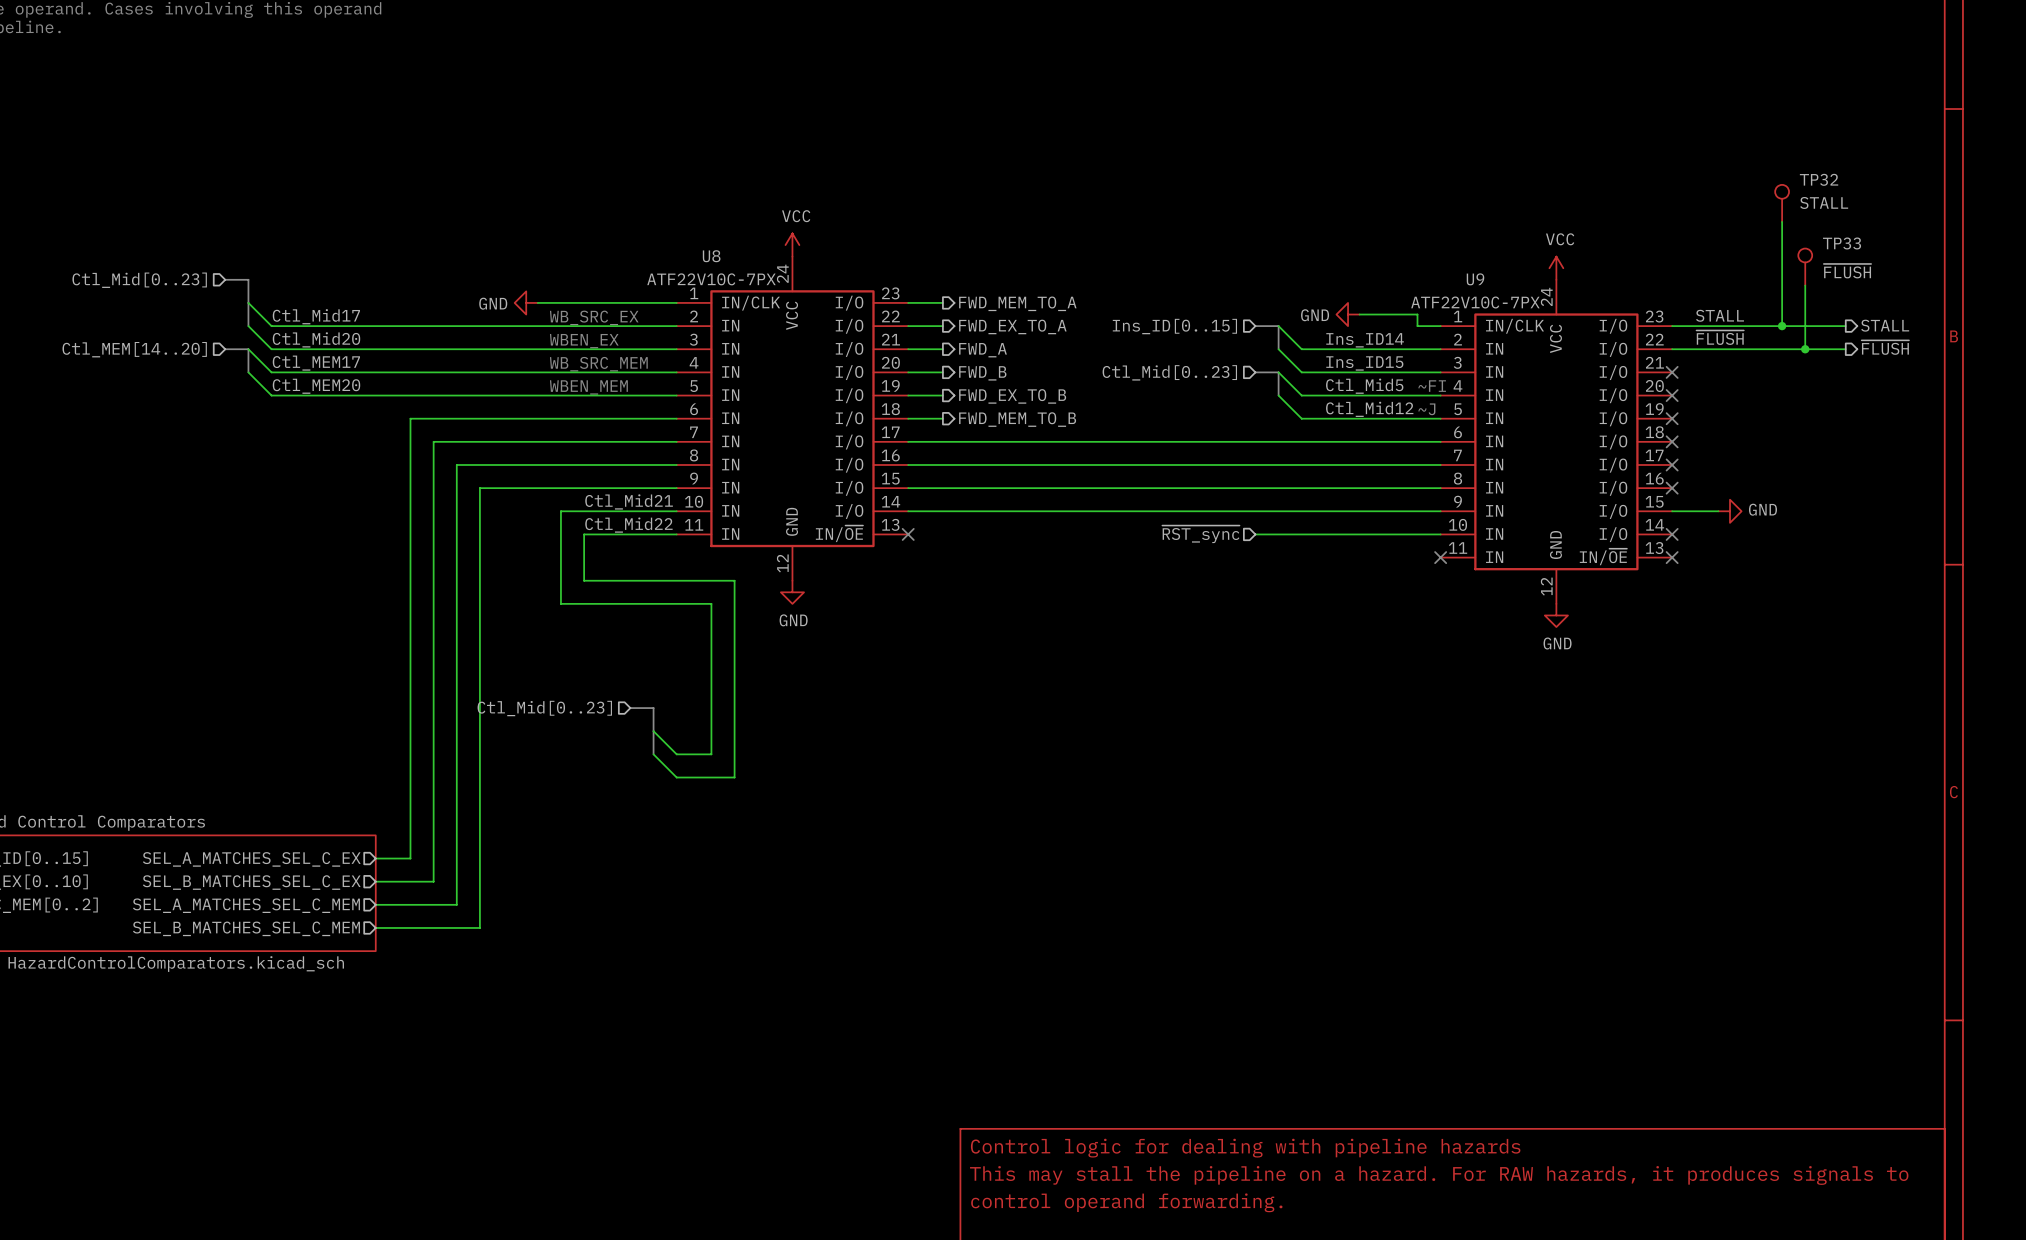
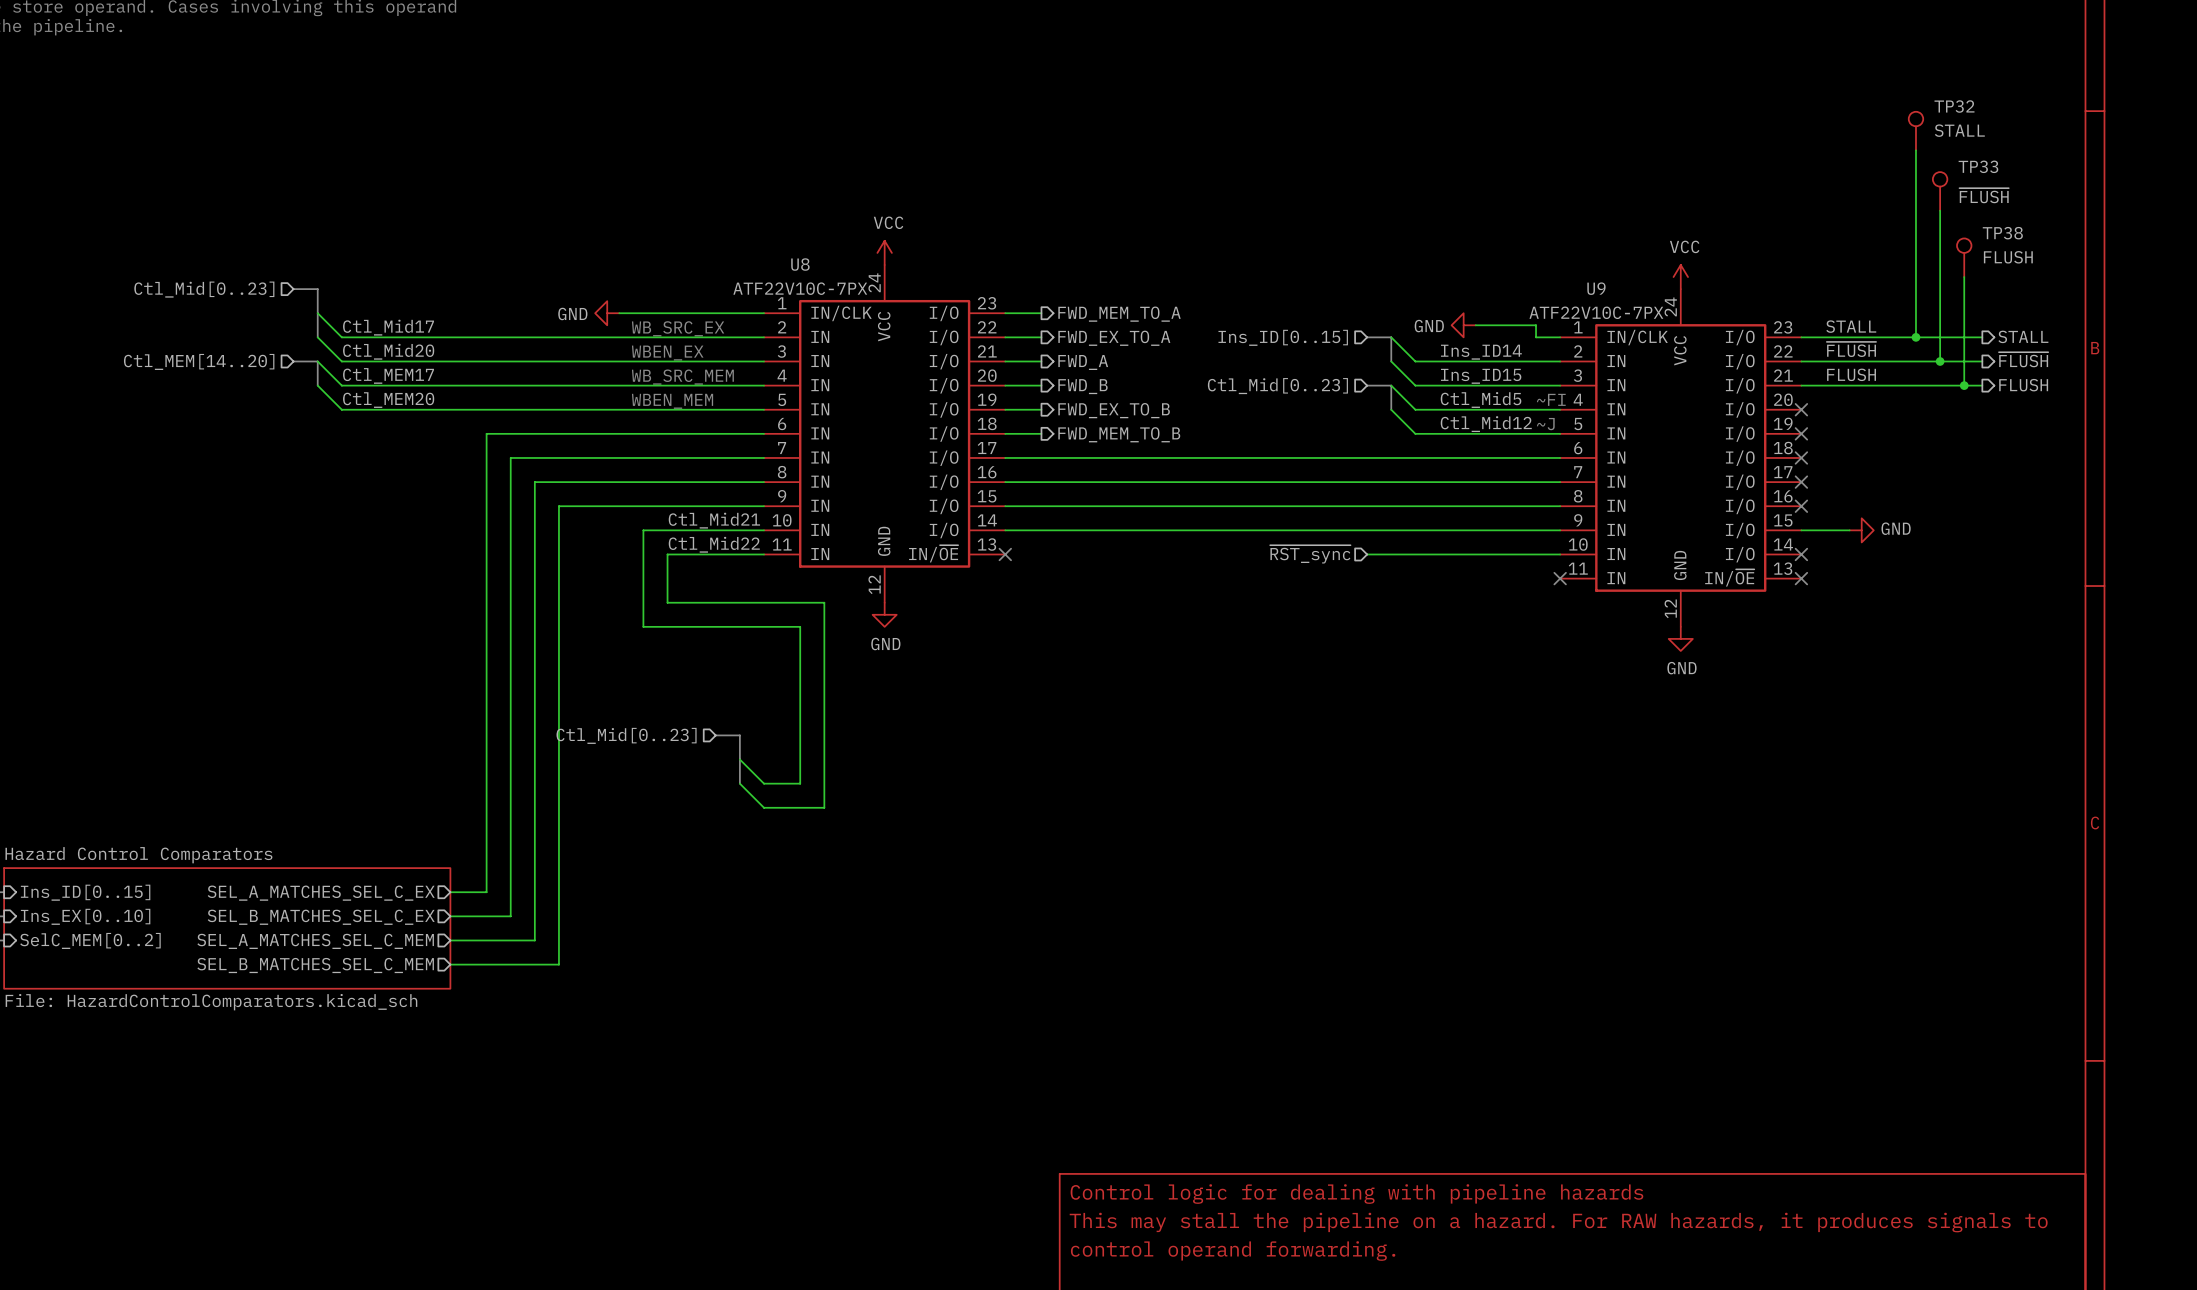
wire: none -> (1915, 150) (1915, 228)
TP32 position: (1782, 203) -> (1915, 131)
wire: none -> (1940, 210) (1940, 295)
TP38: none -> FLUSH (1964, 257)
TP33 position: (1805, 267) -> (1940, 191)
wire: none -> (1964, 277) (1964, 385)
label: none -> FLUSH (1851, 374)
hierarchical label: none -> FLUSH (2023, 385)
wire: none -> (1801, 385) (1982, 385)
no-connect mark: (1672, 372) -> none
junction: none -> (1964, 385)

